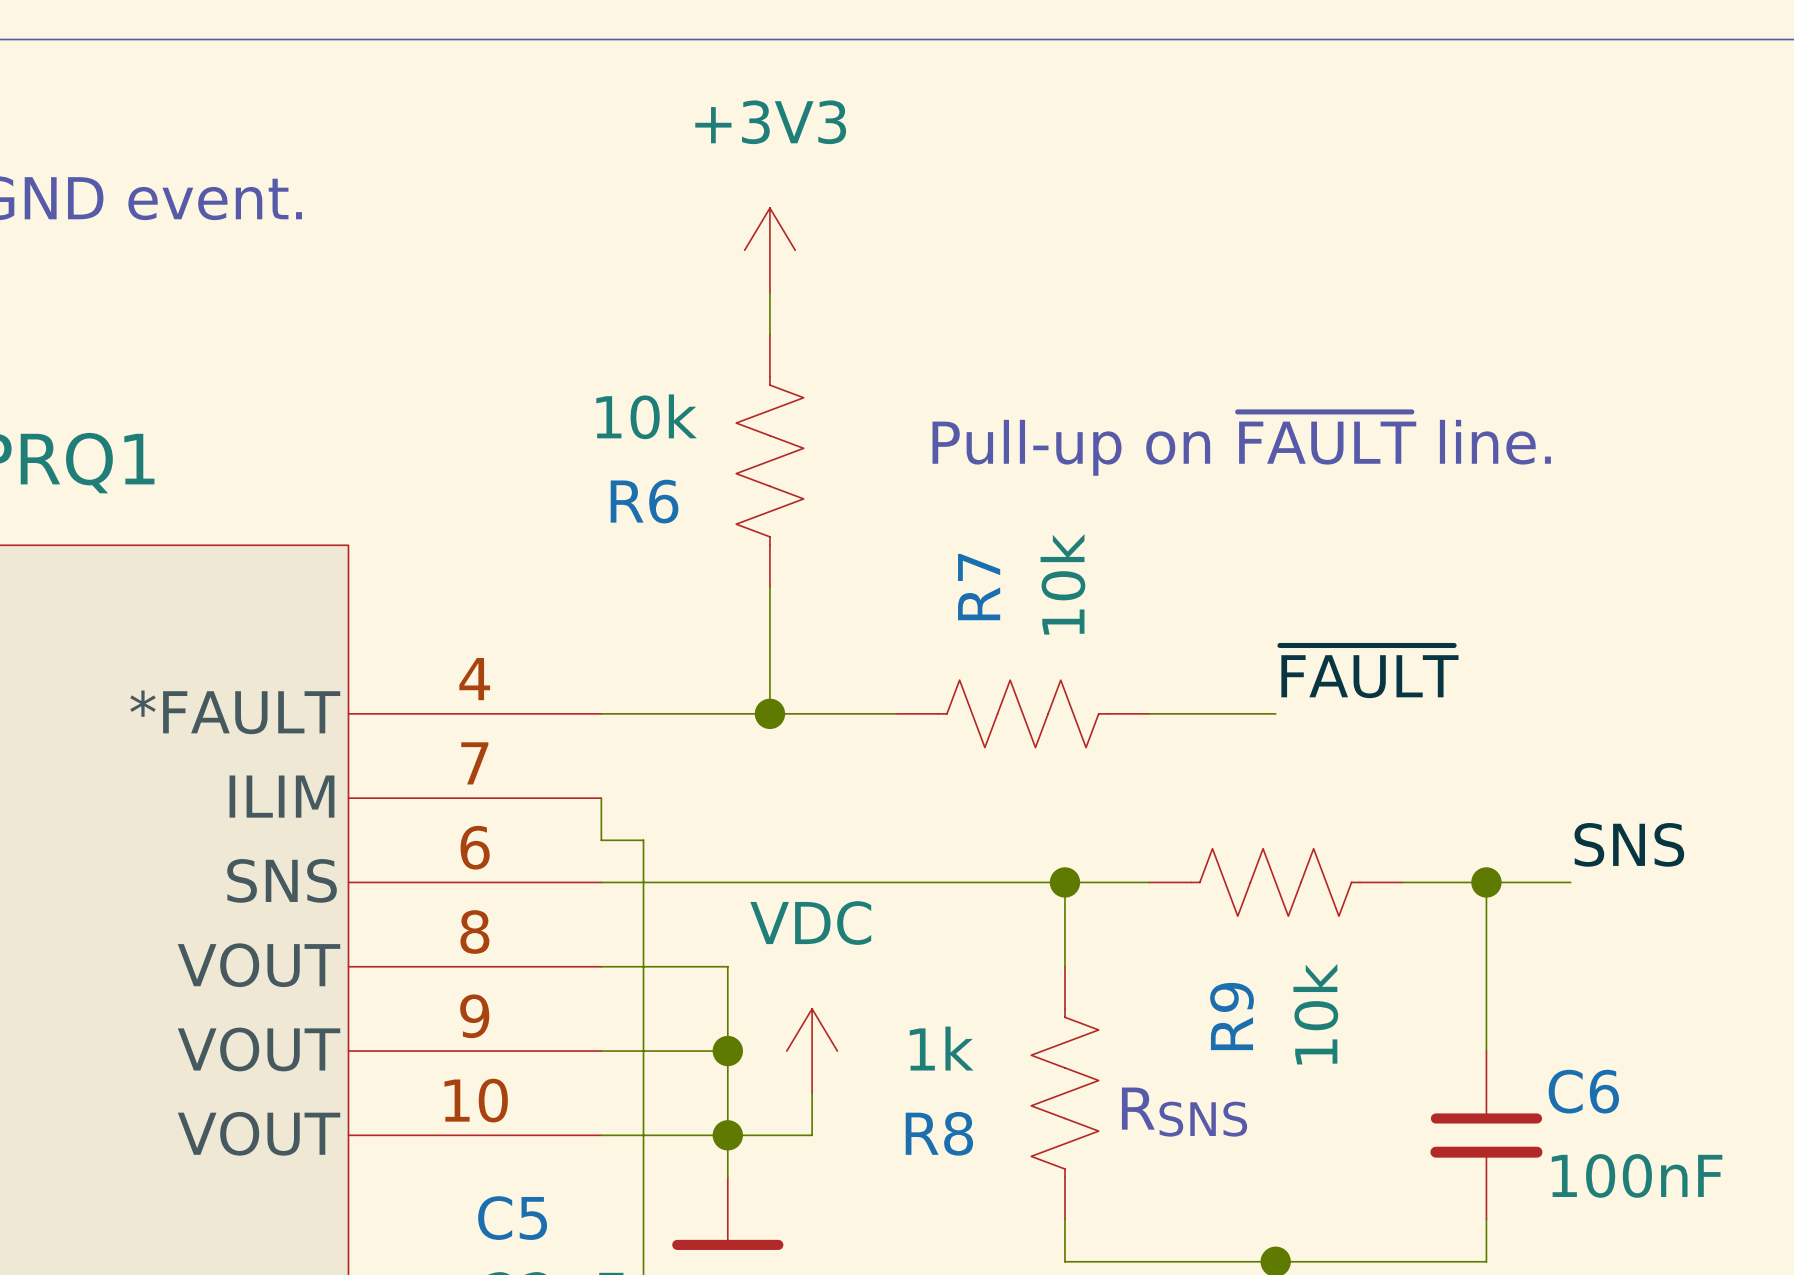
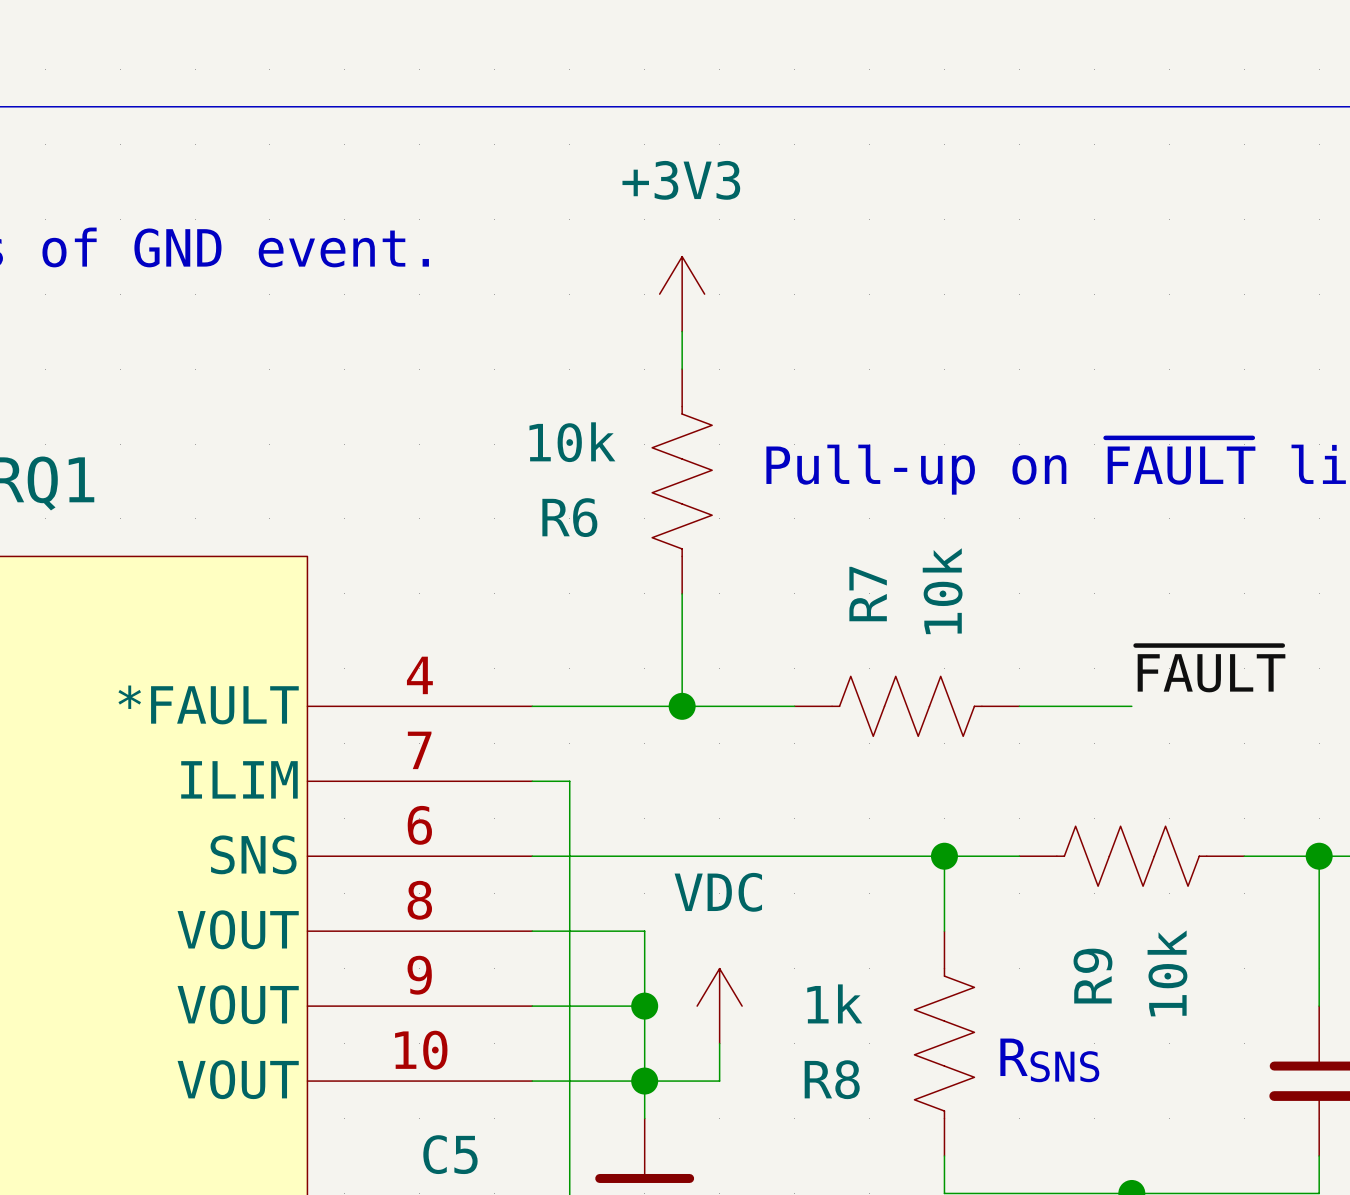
wire: (601, 798) (601, 840) (643, 840) -> (532, 781) (569, 781) (569, 818)

